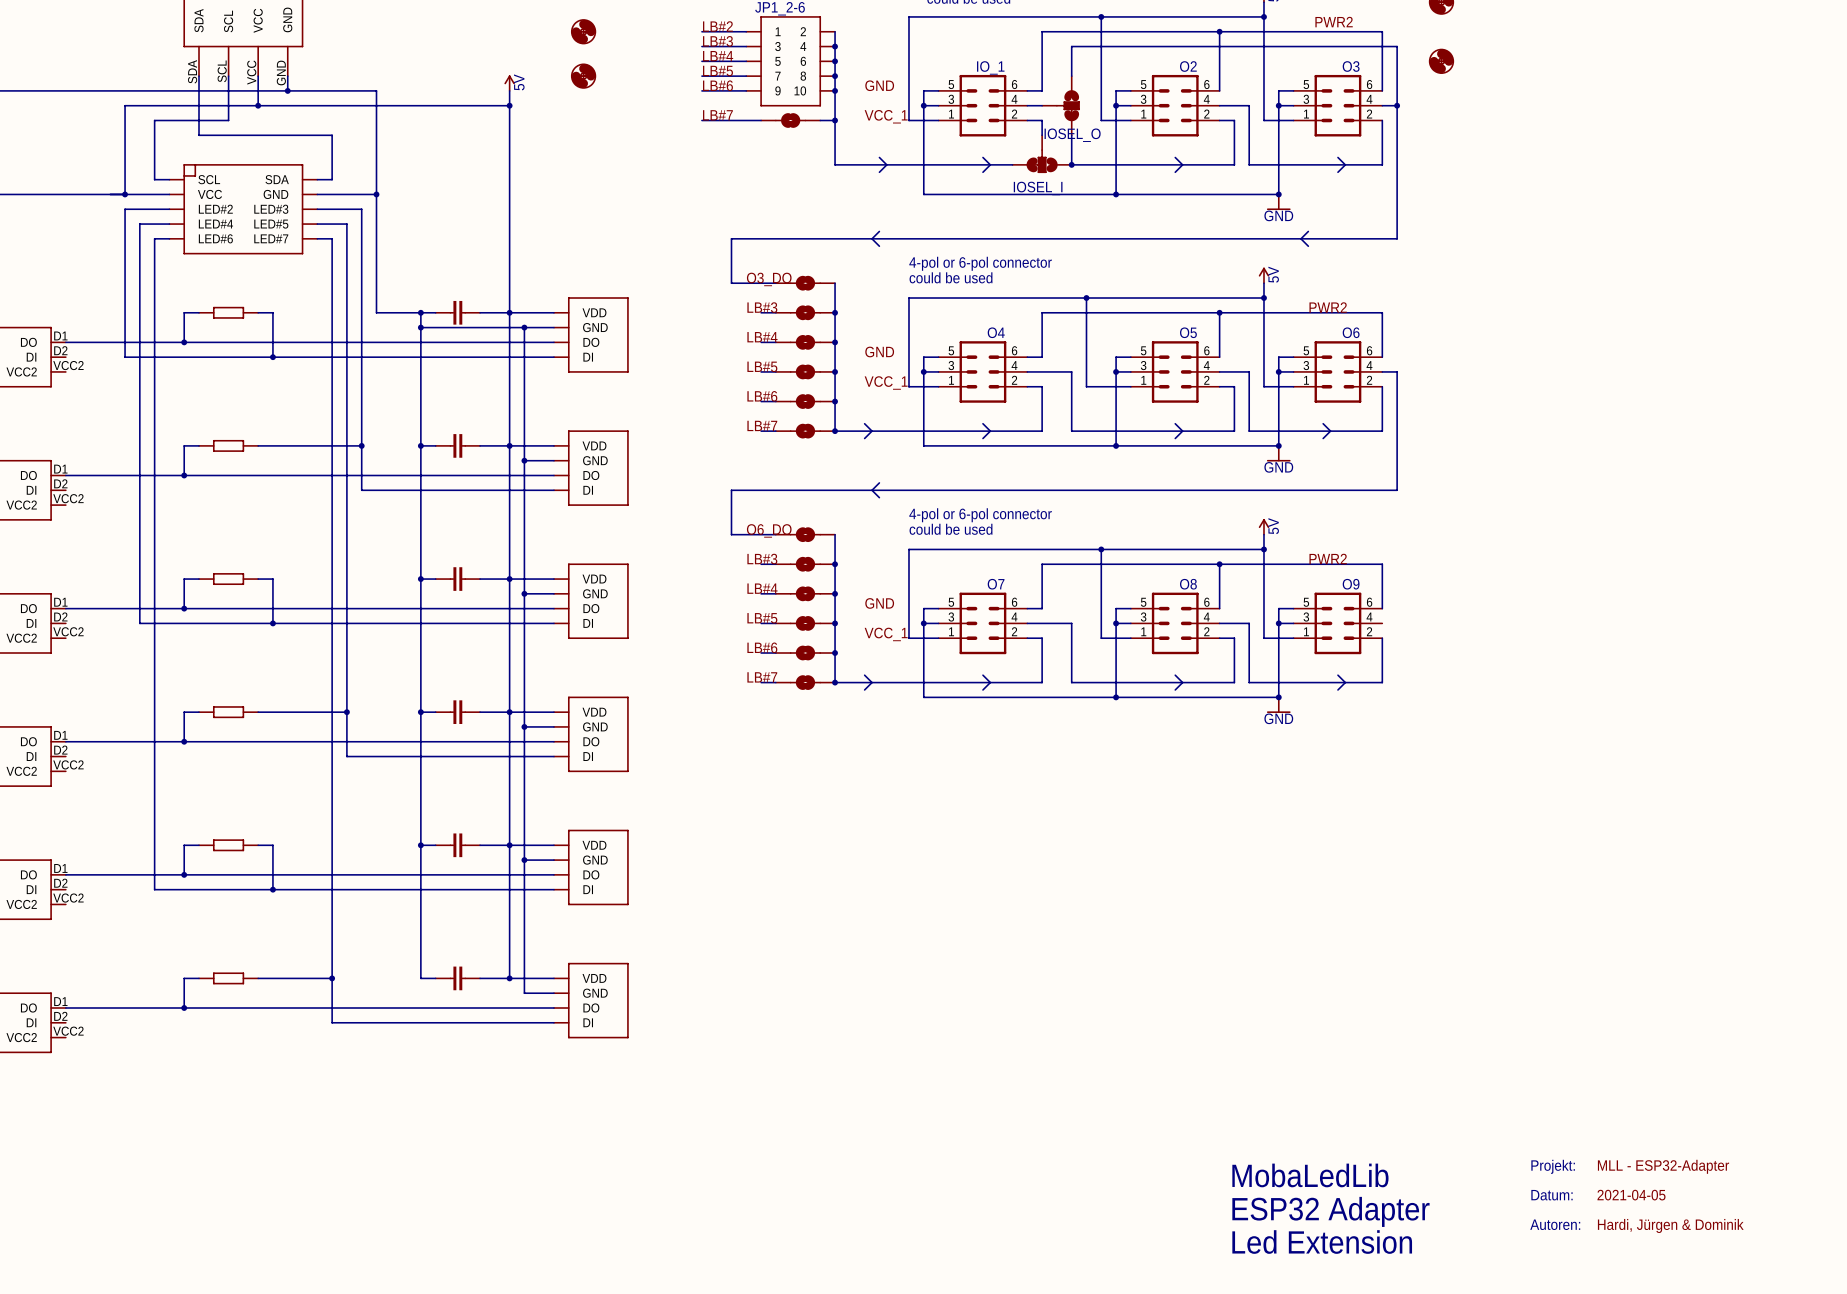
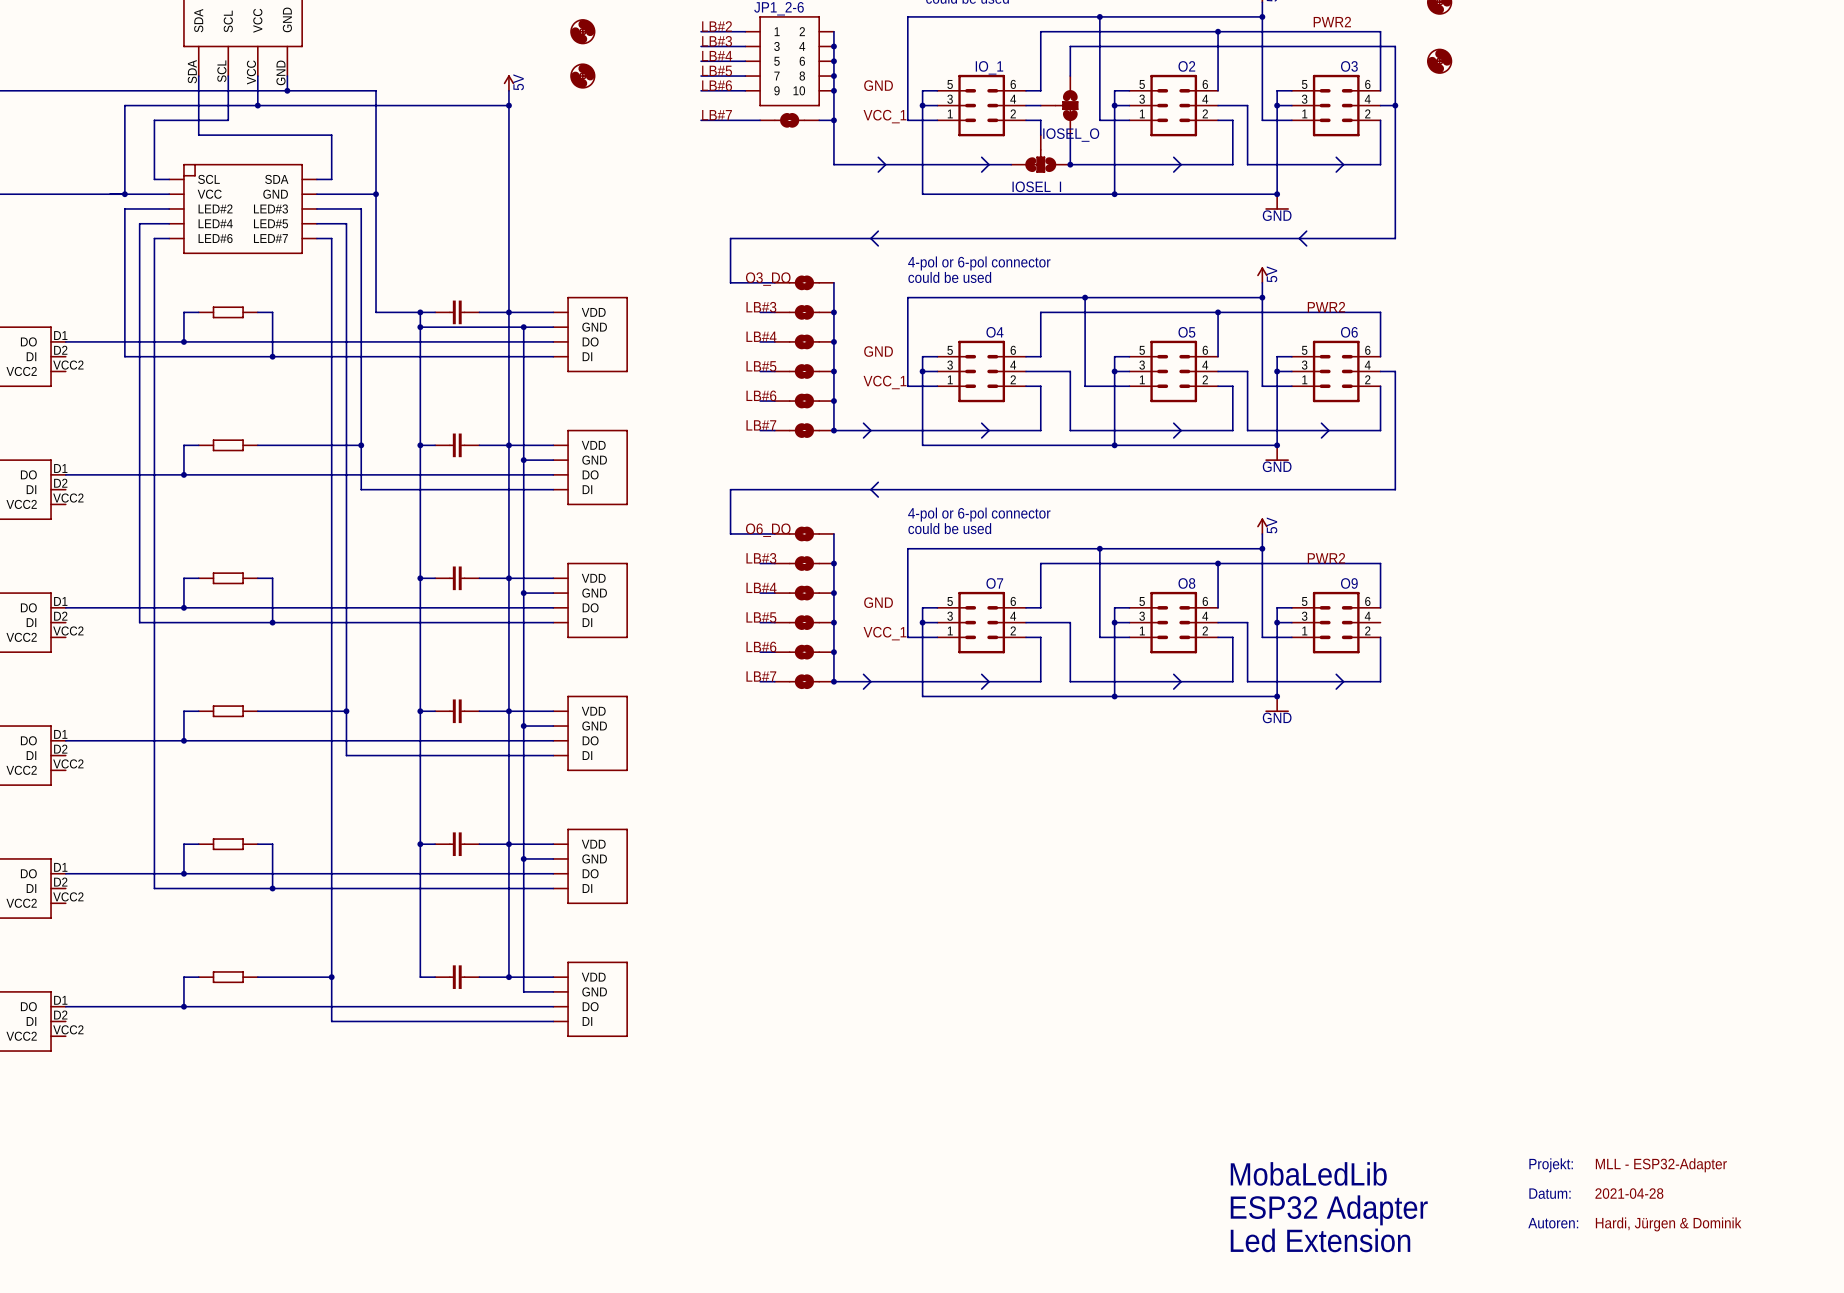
text: 2021-04-05 (1631, 1195) -> 2021-04-28 (1629, 1193)

